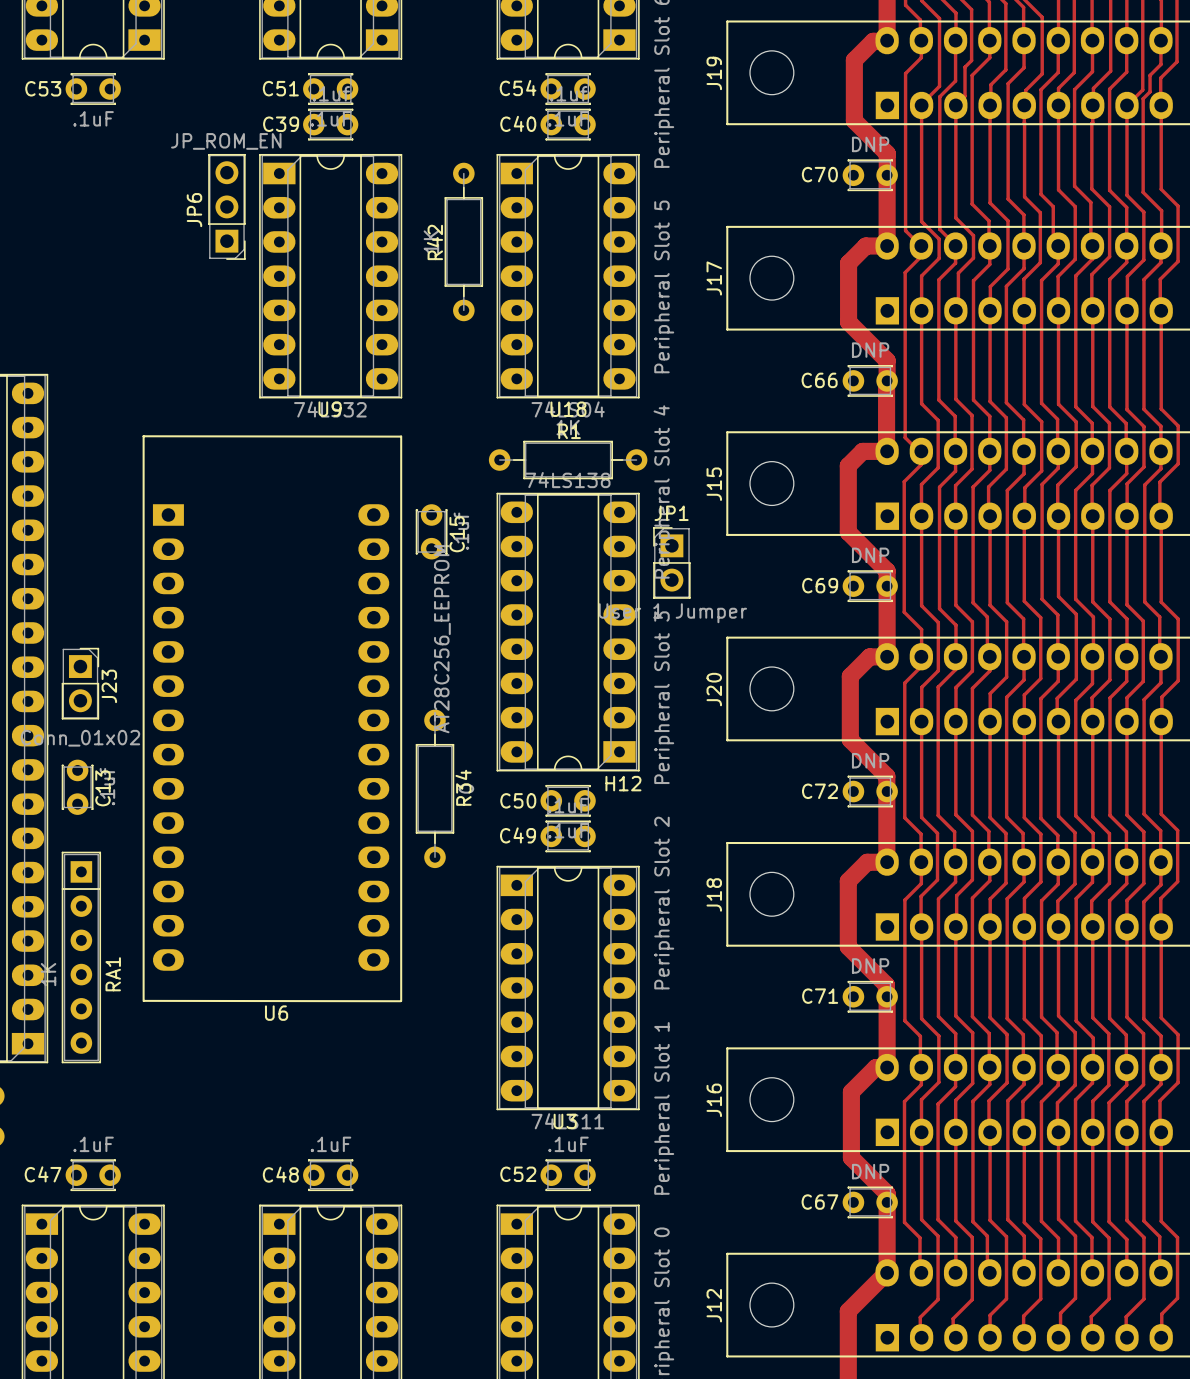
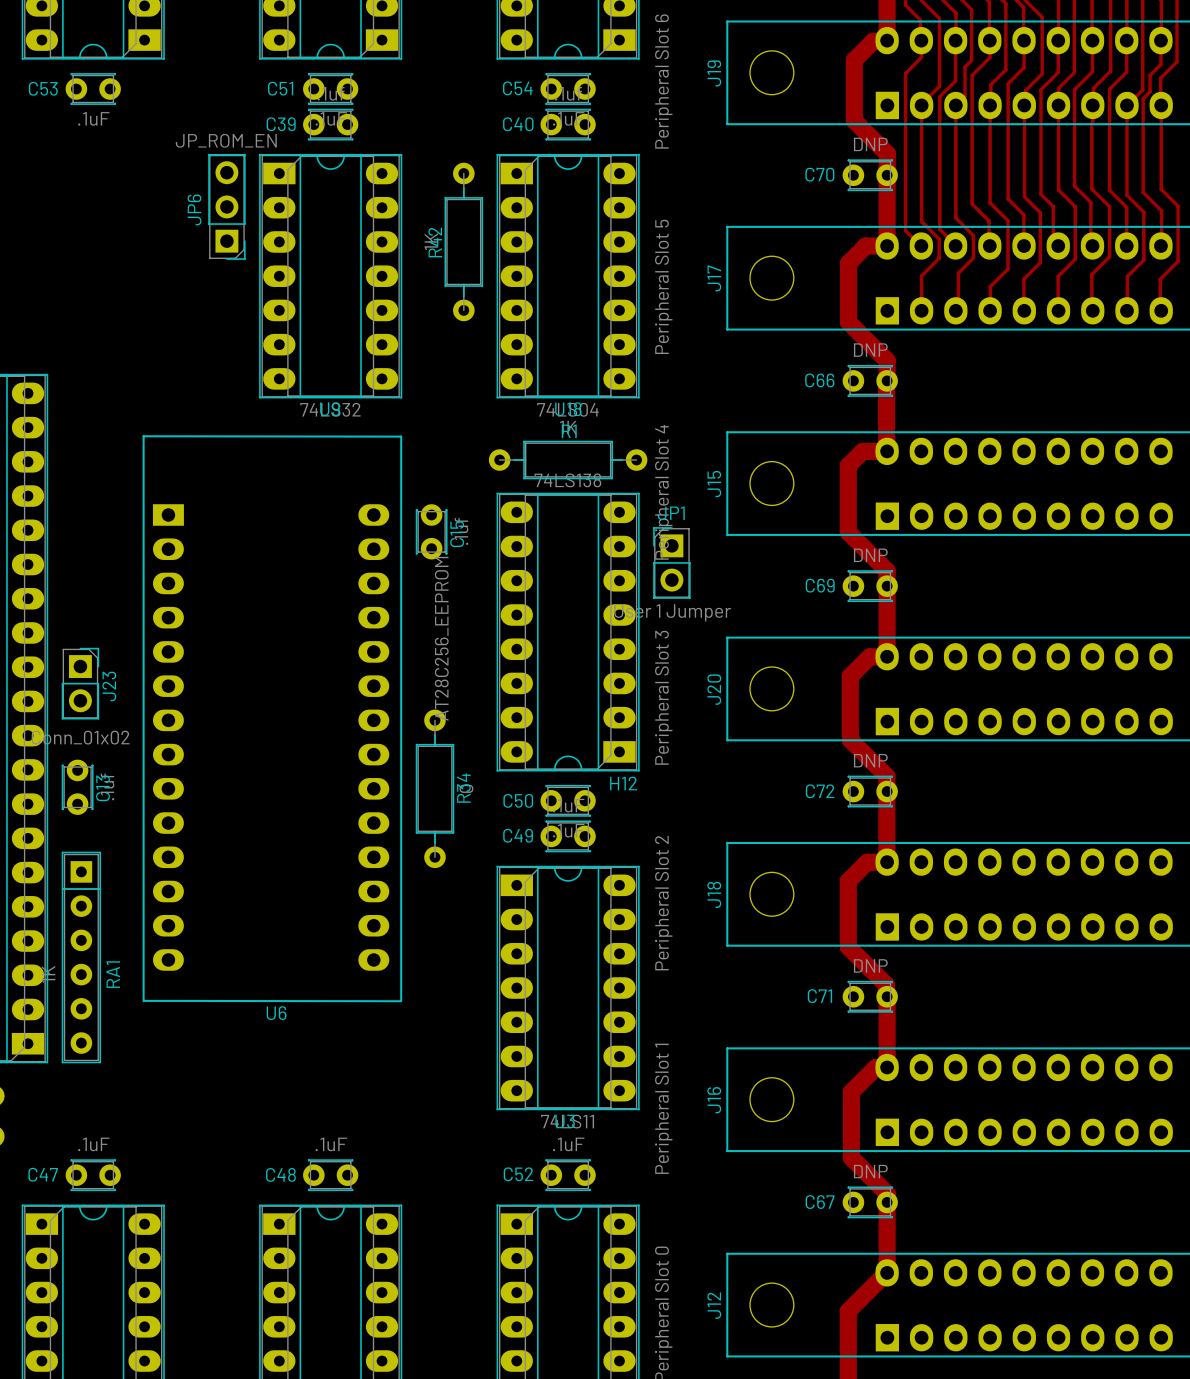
top track: (921, 246) (921, 256) (905, 272) (905, 437) (918, 451) -> none
top track: (955, 246) (955, 263) (938, 279) (938, 400) (955, 416) (955, 451) -> none
top track: (989, 246) (989, 264) (973, 280) (973, 400) (989, 416) (989, 470) (973, 487) (973, 602) (987, 617) (987, 655) -> none
top track: (1024, 246) (1024, 268) (1006, 286) (1006, 402) (1023, 419) (1023, 449) -> none
top track: (1058, 246) (1058, 263) (1041, 280) (1041, 403) (1057, 419) (1057, 450) -> none
top track: (1092, 246) (1092, 259) (1075, 275) (1075, 406) (1092, 423) (1092, 451) -> none
top track: (1126, 246) (1126, 262) (1109, 279) (1109, 407) (1126, 423) (1126, 449) -> none
top track: (1160, 246) (1160, 262) (1143, 279) (1143, 409) (1160, 426) (1160, 451) -> none
top track: (921, 310) (921, 403) (938, 420) (938, 467) (921, 484) (921, 515) -> none
top track: (955, 310) (955, 399) (972, 415) (972, 469) (955, 485) (955, 516) -> none
top track: (990, 310) (990, 401) (1006, 417) (1006, 469) (988, 486) (988, 517) -> none
top track: (1024, 310) (1024, 404) (1041, 421) (1041, 470) (1024, 487) (1024, 515) -> none
top track: (1058, 310) (1058, 404) (1076, 421) (1076, 466) (1057, 485) (1057, 514) -> none
top track: (1092, 310) (1092, 406) (1109, 423) (1109, 467) (1092, 485) (1092, 516) -> none
top track: (1126, 310) (1126, 409) (1143, 426) (1143, 467) (1127, 483) (1127, 519) -> none
top track: (1161, 310) (1161, 408) (1178, 425) (1178, 463) (1159, 482) (1159, 517) -> none
top track: (921, 451) (921, 464) (904, 481) (904, 612) (921, 629) (921, 655) -> none
top track: (955, 451) (955, 471) (939, 487) (939, 608) (955, 625) (955, 656) -> none
top track: (1024, 451) (1024, 473) (1007, 490) (1007, 602) (1023, 619) (1023, 657) -> none
top track: (1058, 451) (1058, 468) (1042, 484) (1042, 599) (1057, 614) (1057, 655) -> none
top track: (1092, 451) (1092, 473) (1075, 490) (1075, 599) (1093, 617) (1093, 653) -> none
top track: (1126, 451) (1126, 473) (1109, 490) (1109, 601) (1126, 619) (1126, 656) -> none
top track: (1160, 451) (1160, 468) (1144, 484) (1144, 602) (1159, 617) (1159, 656) -> none
top track: (921, 516) (921, 605) (938, 622) (938, 670) (921, 687) (921, 720) -> none
top track: (955, 516) (955, 605) (972, 621) (972, 671) (955, 687) (955, 721) -> none
top track: (990, 516) (990, 605) (1006, 621) (1006, 677) (990, 693) (990, 723) -> none
top track: (1024, 516) (1024, 601) (1040, 617) (1040, 678) (1024, 695) (1024, 720) -> none
top track: (1058, 516) (1058, 596) (1076, 614) (1076, 679) (1057, 698) (1057, 720) -> none
top track: (1092, 516) (1092, 601) (1109, 619) (1109, 679) (1092, 697) (1092, 720) -> none
top track: (1126, 516) (1126, 604) (1143, 621) (1143, 681) (1126, 697) (1126, 815) (1143, 831) (1143, 883) (1126, 900) (1126, 926) -> none
top track: (1161, 516) (1161, 602) (1178, 619) (1178, 680) (1161, 697) (1161, 720) -> none
top track: (921, 656) (921, 666) (904, 683) (904, 817) (921, 834) (921, 860) -> none
top track: (955, 656) (955, 669) (938, 687) (938, 815) (954, 831) (954, 860) -> none
top track: (989, 656) (989, 671) (972, 688) (972, 814) (988, 831) (988, 865) -> none
top track: (1024, 656) (1024, 679) (1006, 697) (1006, 816) (1023, 833) (1023, 864) -> none
top track: (1058, 656) (1058, 681) (1040, 698) (1040, 818) (1057, 835) (1057, 858) -> none
top track: (1092, 656) (1092, 683) (1075, 700) (1075, 815) (1093, 833) (1093, 861) -> none
top track: (1126, 656) (1126, 681) (1110, 698) (1110, 815) (1126, 831) (1126, 861) -> none
top track: (1160, 656) (1160, 682) (1144, 699) (1144, 814) (1160, 830) (1160, 861) -> none
top track: (921, 721) (921, 817) (937, 833) (937, 879) (921, 896) (921, 926) -> none
top track: (955, 721) (955, 814) (972, 831) (972, 879) (956, 895) (956, 927) -> none
top track: (990, 721) (990, 817) (1005, 833) (1005, 883) (990, 899) (990, 927) -> none
top track: (1024, 721) (1024, 817) (1040, 834) (1040, 881) (1024, 898) (1024, 927) -> none
top track: (1058, 721) (1058, 816) (1074, 832) (1074, 883) (1057, 901) (1057, 925) -> none
top track: (1092, 721) (1092, 816) (1109, 833) (1109, 883) (1091, 900) (1091, 925) -> none
top track: (1161, 721) (1161, 814) (1177, 830) (1177, 881) (1160, 898) (1160, 927) -> none
top track: (921, 862) (921, 883) (904, 900) (904, 1020) (920, 1036) (920, 1065) -> none
top track: (955, 862) (955, 881) (938, 899) (938, 1016) (955, 1033) (955, 1065) -> none
top track: (989, 862) (989, 880) (972, 898) (972, 1016) (989, 1033) (989, 1066) -> none
top track: (1024, 862) (1024, 881) (1007, 898) (1007, 1018) (1023, 1034) (1023, 1068) -> none
top track: (1058, 862) (1058, 884) (1041, 900) (1041, 1017) (1057, 1032) (1057, 1067) -> none
top track: (1092, 862) (1092, 882) (1076, 898) (1076, 1020) (1093, 1038) (1093, 1068) -> none
top track: (1126, 862) (1126, 883) (1109, 900) (1109, 1018) (1126, 1035) (1126, 1065) -> none
top track: (1160, 862) (1160, 884) (1143, 901) (1143, 1018) (1161, 1036) (1161, 1065) -> none
top track: (921, 926) (921, 1018) (938, 1035) (938, 1082) (921, 1099) (921, 1131) -> none
top track: (955, 926) (955, 1016) (972, 1032) (972, 1083) (955, 1100) (955, 1131) -> none
top track: (990, 926) (990, 1017) (1007, 1034) (1007, 1082) (989, 1100) (989, 1132) -> none
top track: (1024, 926) (1024, 1018) (1041, 1035) (1041, 1083) (1022, 1101) (1022, 1133) -> none
top track: (1058, 926) (1058, 1015) (1075, 1032) (1075, 1085) (1057, 1102) (1057, 1131) -> none
top track: (1092, 926) (1092, 1017) (1108, 1033) (1108, 1085) (1092, 1101) (1092, 1131) -> none
top track: (1126, 926) (1126, 1017) (1143, 1033) (1143, 1084) (1126, 1101) (1126, 1131) -> none
top track: (1161, 926) (1161, 1017) (1178, 1034) (1178, 1082) (1160, 1100) (1160, 1133) -> none
top track: (921, 1067) (921, 1084) (904, 1101) (904, 1222) (920, 1237) (920, 1270) -> none
top track: (955, 1067) (955, 1086) (938, 1104) (938, 1219) (955, 1237) (955, 1270) -> none
top track: (989, 1067) (989, 1084) (972, 1101) (972, 1221) (987, 1236) (987, 1271) -> none
top track: (1024, 1067) (1024, 1084) (1007, 1100) (1007, 1219) (1024, 1236) (1024, 1270) -> none
top track: (1058, 1067) (1058, 1085) (1041, 1102) (1041, 1221) (1058, 1238) (1058, 1271) -> none
top track: (1092, 1067) (1092, 1083) (1075, 1099) (1075, 1221) (1091, 1237) (1091, 1270) -> none
top track: (1126, 1067) (1126, 1085) (1109, 1102) (1109, 1221) (1126, 1239) (1126, 1271) -> none
top track: (1160, 1067) (1160, 1084) (1143, 1101) (1143, 1221) (1159, 1236) (1159, 1271) -> none
top track: (921, 1132) (921, 1219) (938, 1236) (938, 1299) (920, 1317) (920, 1333) -> none
top track: (955, 1132) (955, 1221) (972, 1237) (972, 1299) (953, 1318) (953, 1335) -> none
top track: (990, 1132) (990, 1220) (1006, 1236) (1006, 1298) (990, 1315) (990, 1337) -> none
top track: (1024, 1132) (1024, 1222) (1040, 1238) (1040, 1298) (1023, 1316) (1023, 1338) -> none
top track: (1058, 1132) (1058, 1219) (1075, 1236) (1075, 1298) (1060, 1313) (1060, 1336) -> none
top track: (1092, 1132) (1092, 1221) (1109, 1238) (1109, 1298) (1091, 1316) (1091, 1335) -> none
top track: (1126, 1132) (1126, 1220) (1143, 1237) (1143, 1299) (1126, 1316) (1126, 1336) -> none
top track: (1161, 1132) (1161, 1221) (1177, 1237) (1177, 1298) (1161, 1313) (1161, 1335) -> none

